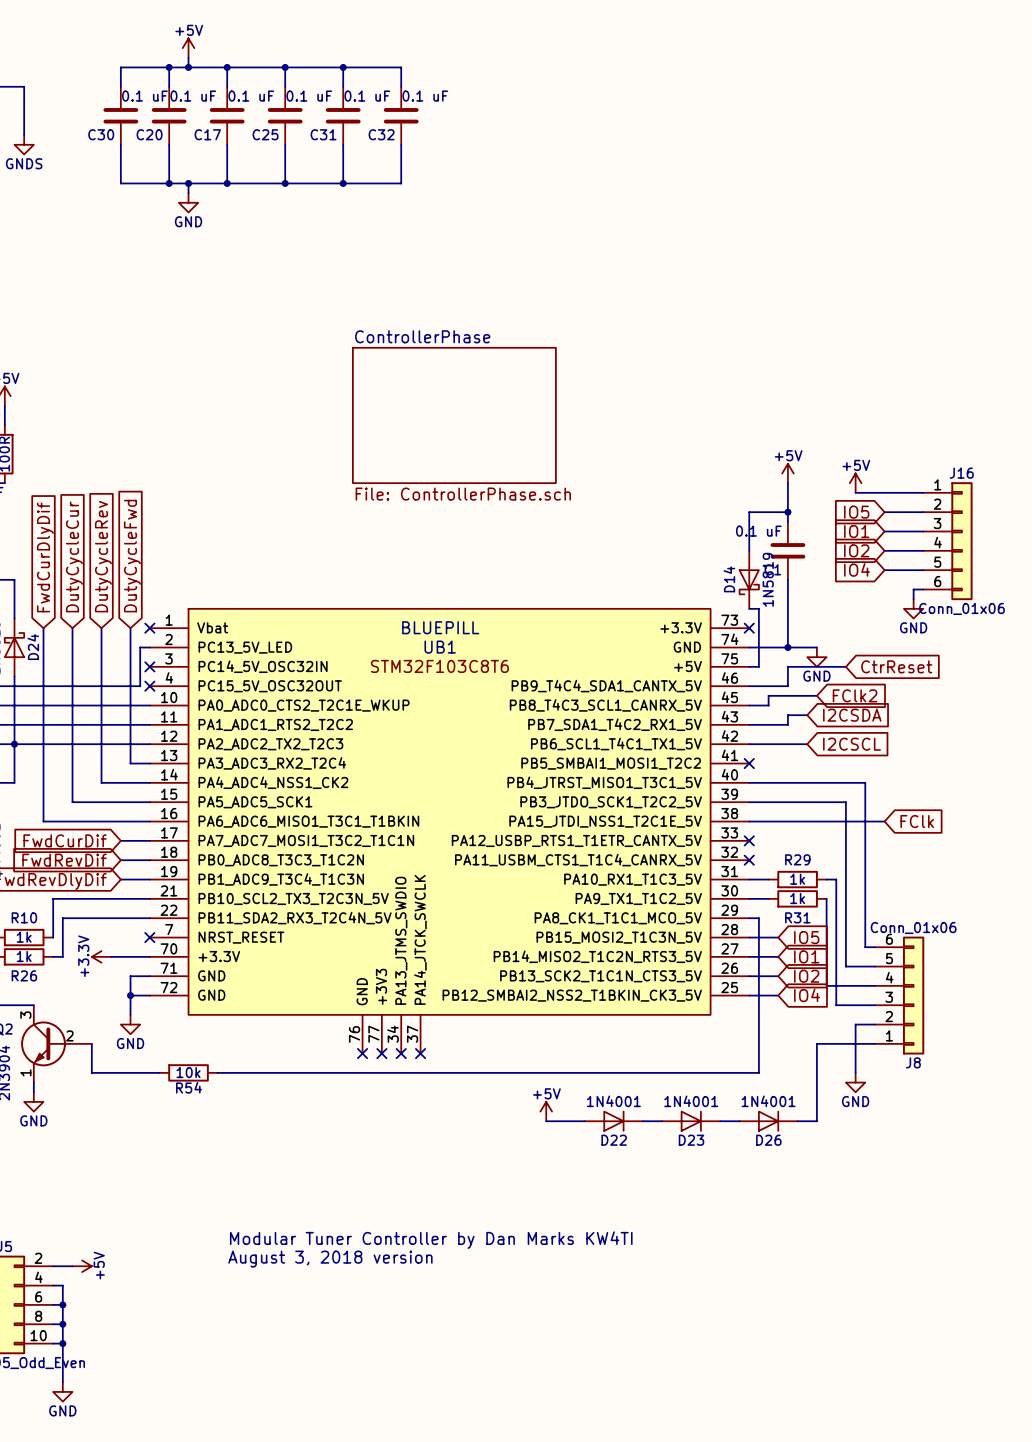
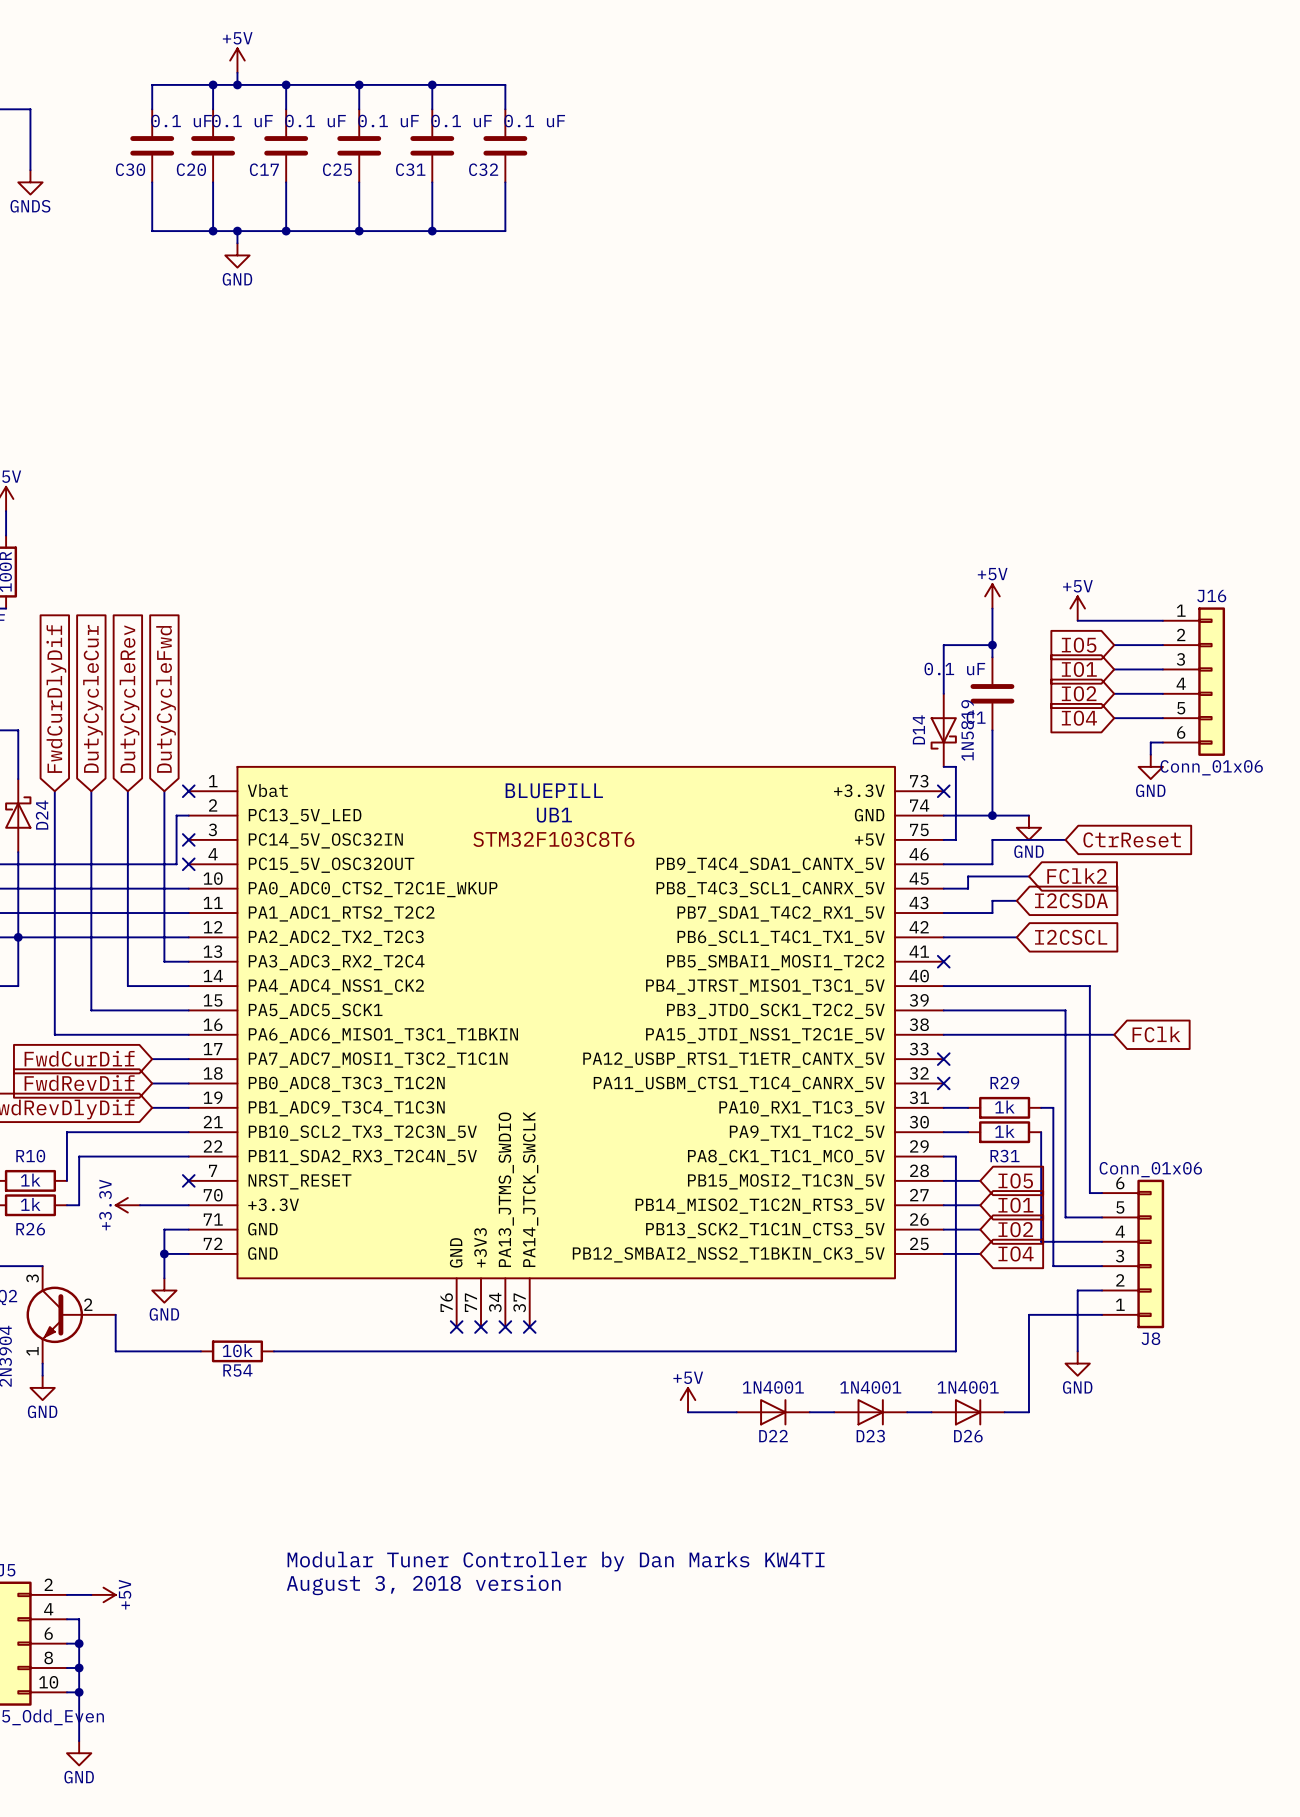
sheet ControllerPhase: File: ControllerPhase.sch (454, 415) -> none

